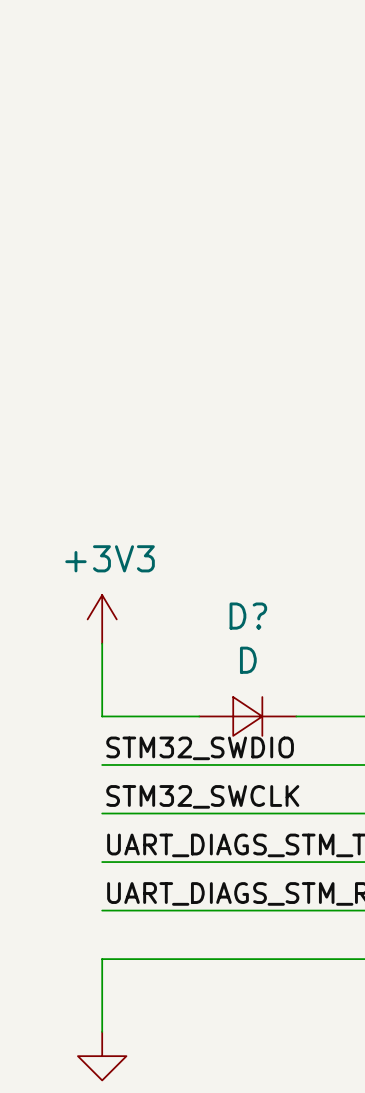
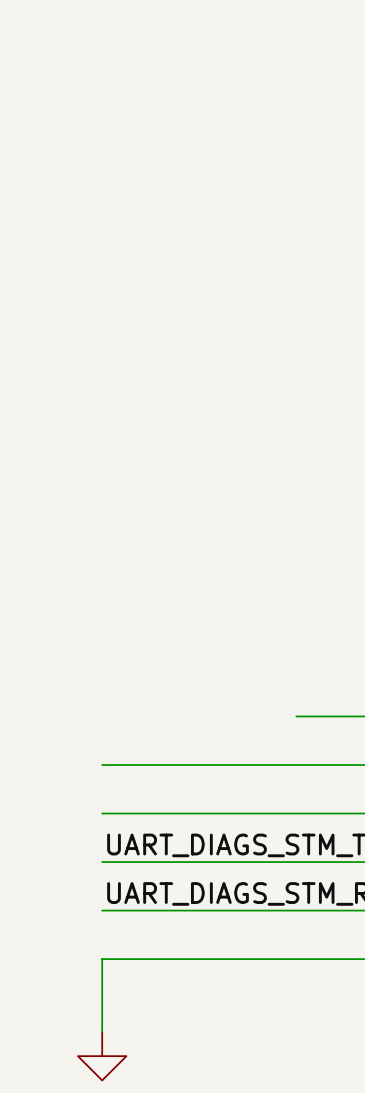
power symbol: +3V3 (102, 619) -> none
wire: (102, 643) (102, 716) (199, 716) -> none
D?: D (247, 716) -> none
label: STM32_SWDIO (200, 748) -> none
label: STM32_SWCLK (202, 796) -> none

